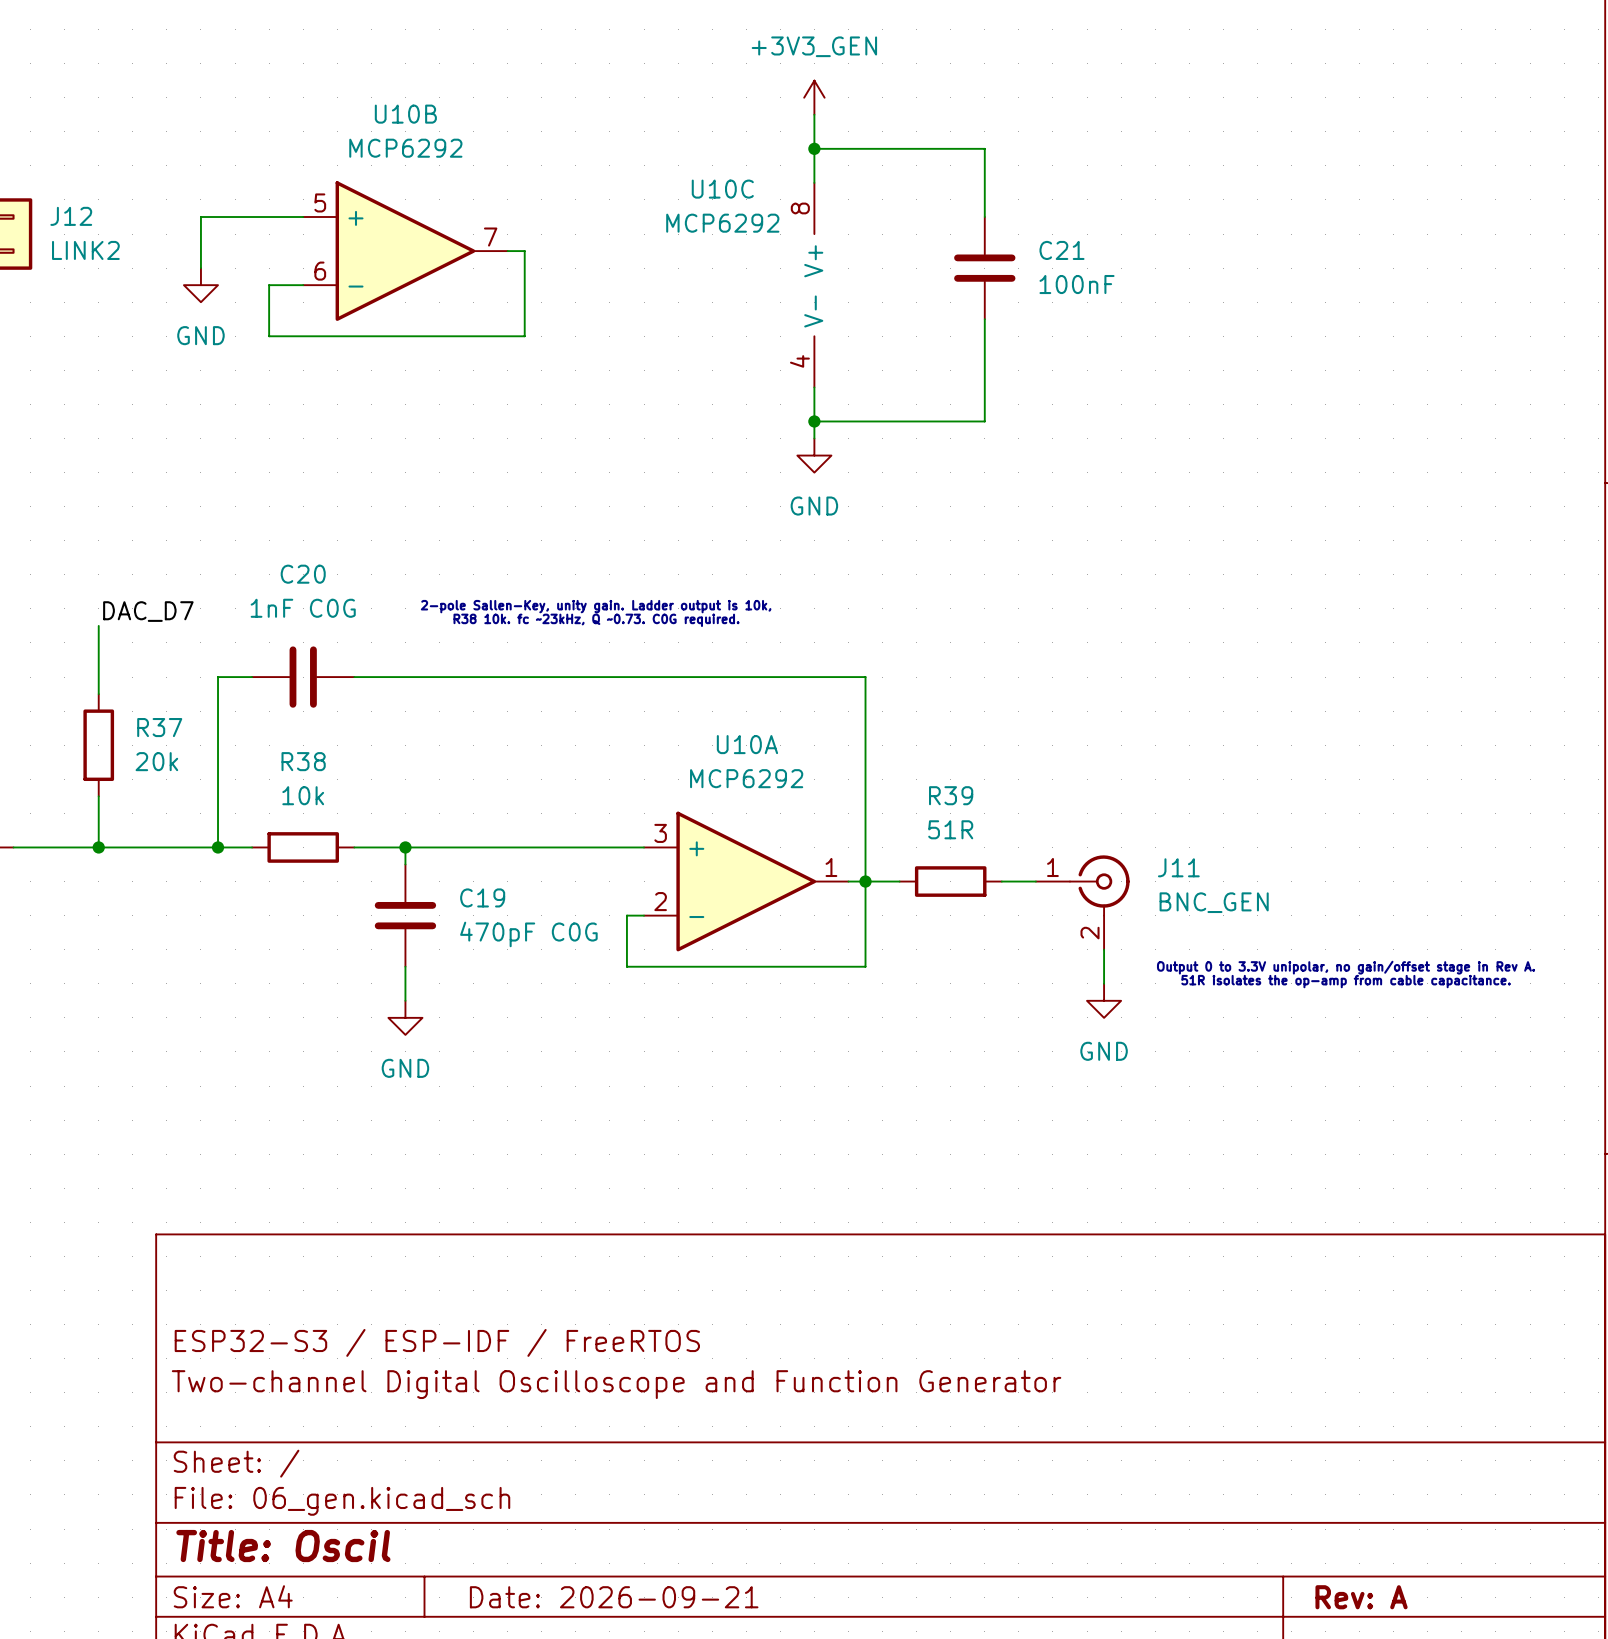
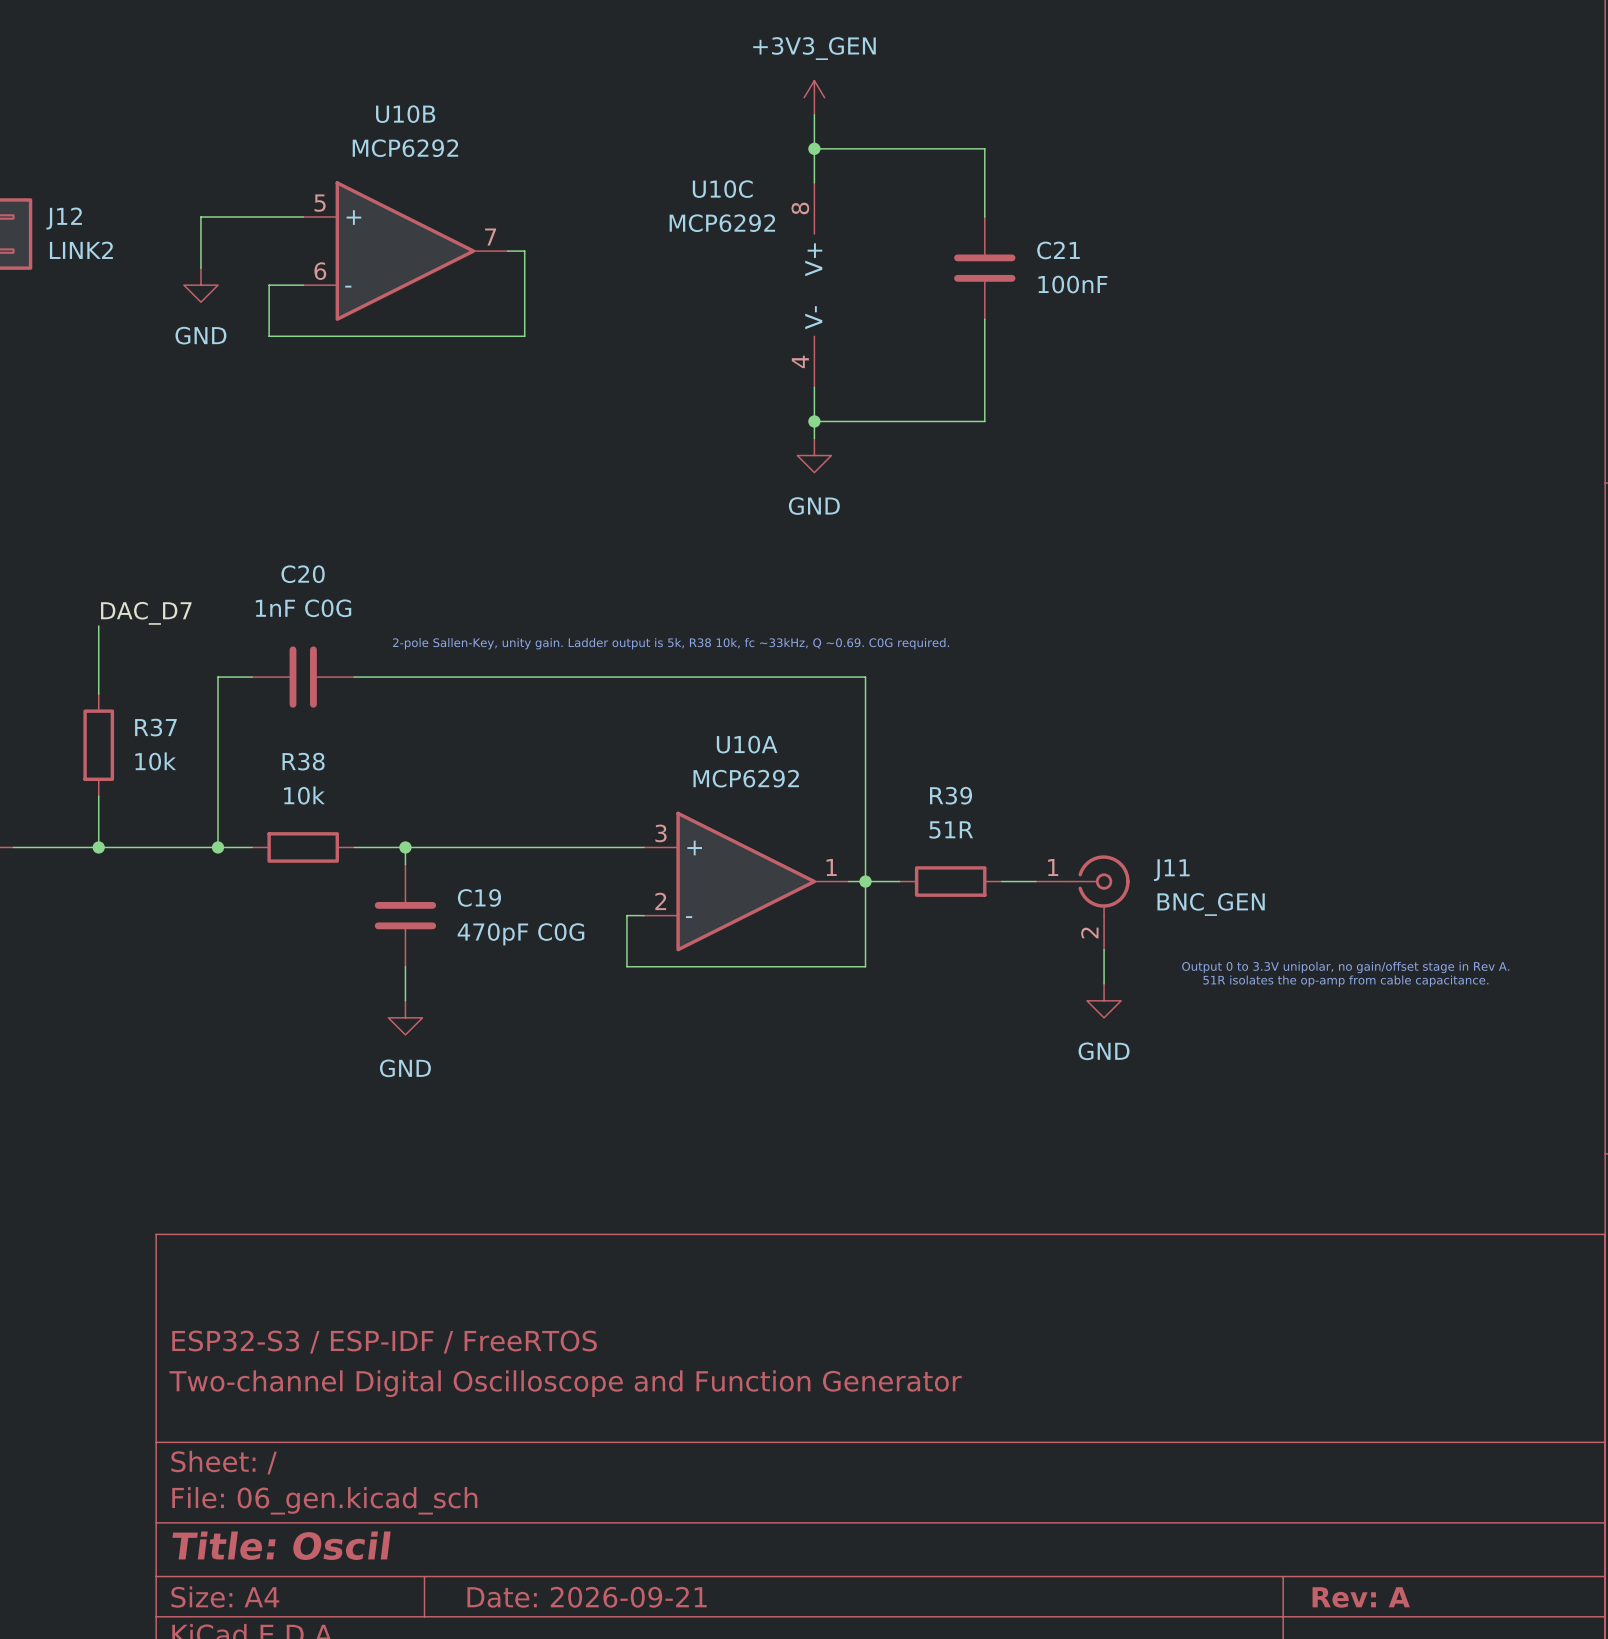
text: 2-pole Sallen-Key, unity gain. Ladder output is 10k, (596, 606) -> none
text: R38 10k. fc ~23kHz, Q ~0.73. C0G required. (596, 620) -> none
text: none -> 2-pole Sallen-Key, unity gain. Ladder output is 5k, R38 10k, fc ~33kHz, Q ~0.69. C0G required. (671, 643)
R37 value: 20k (156, 761) -> 10k (155, 761)

